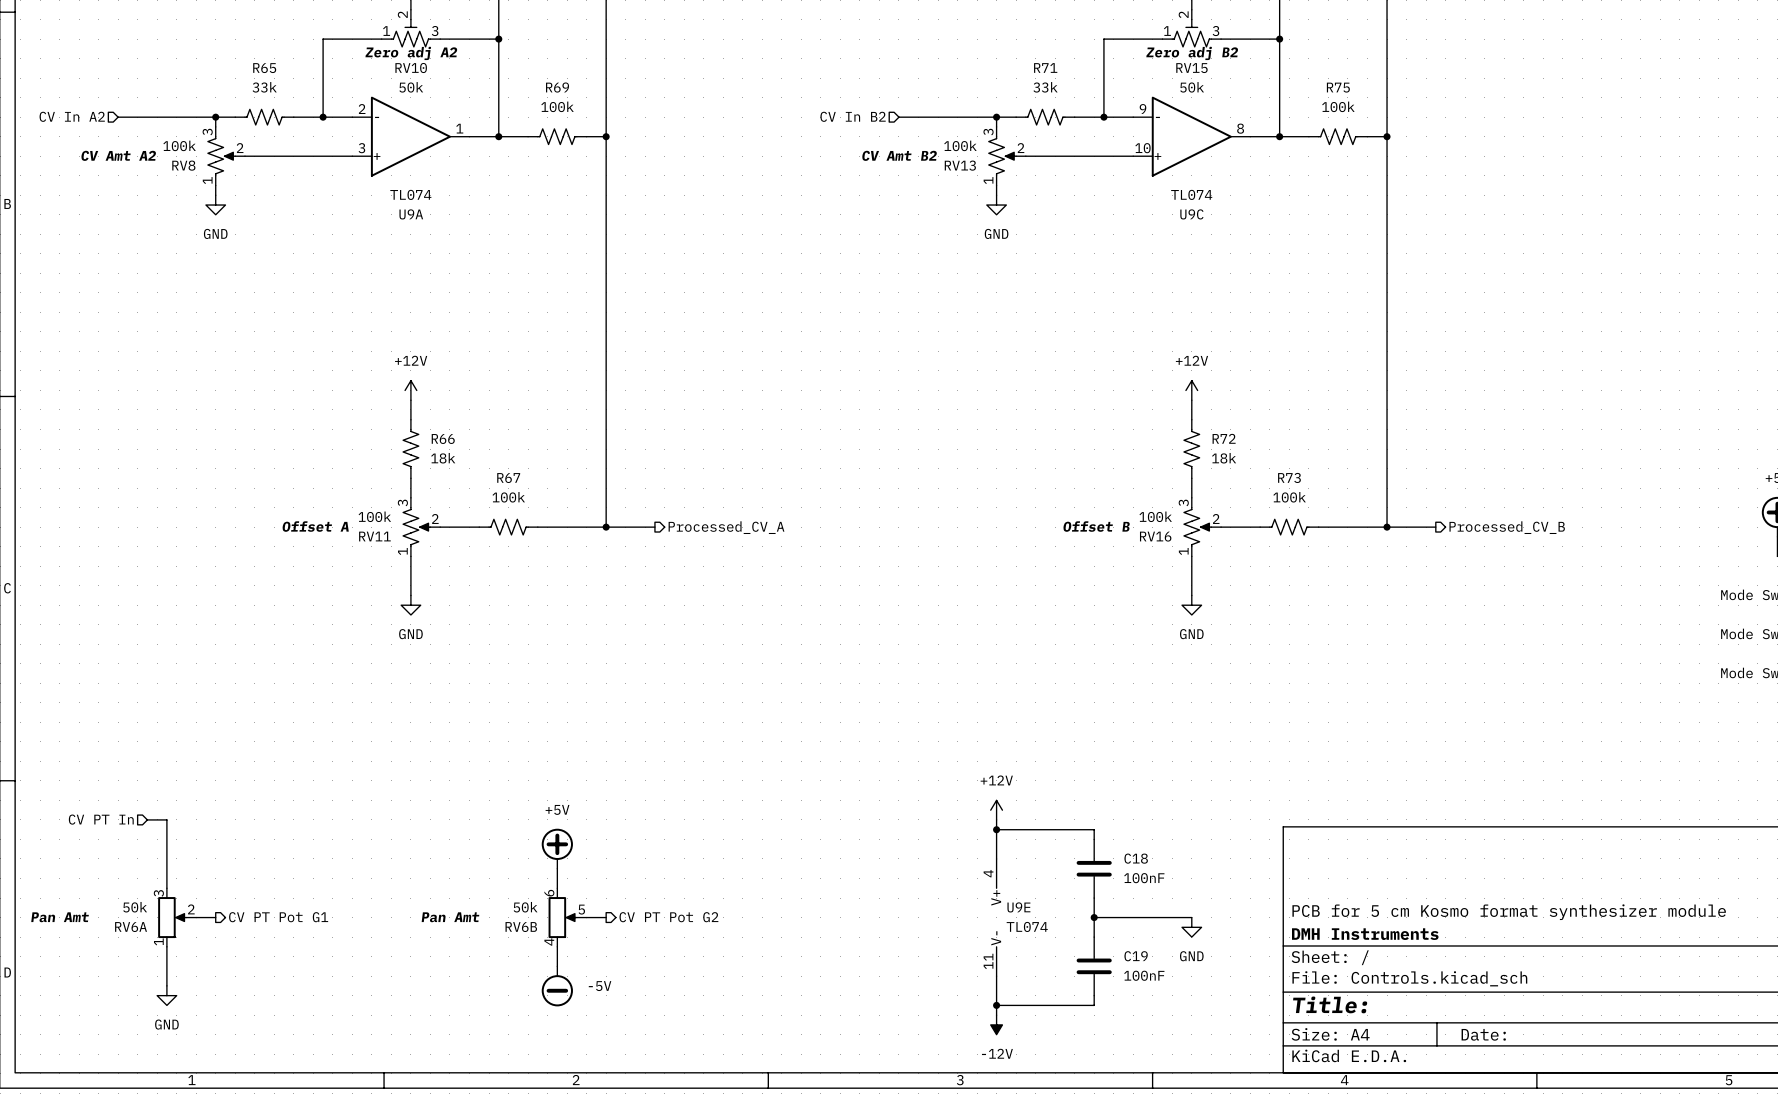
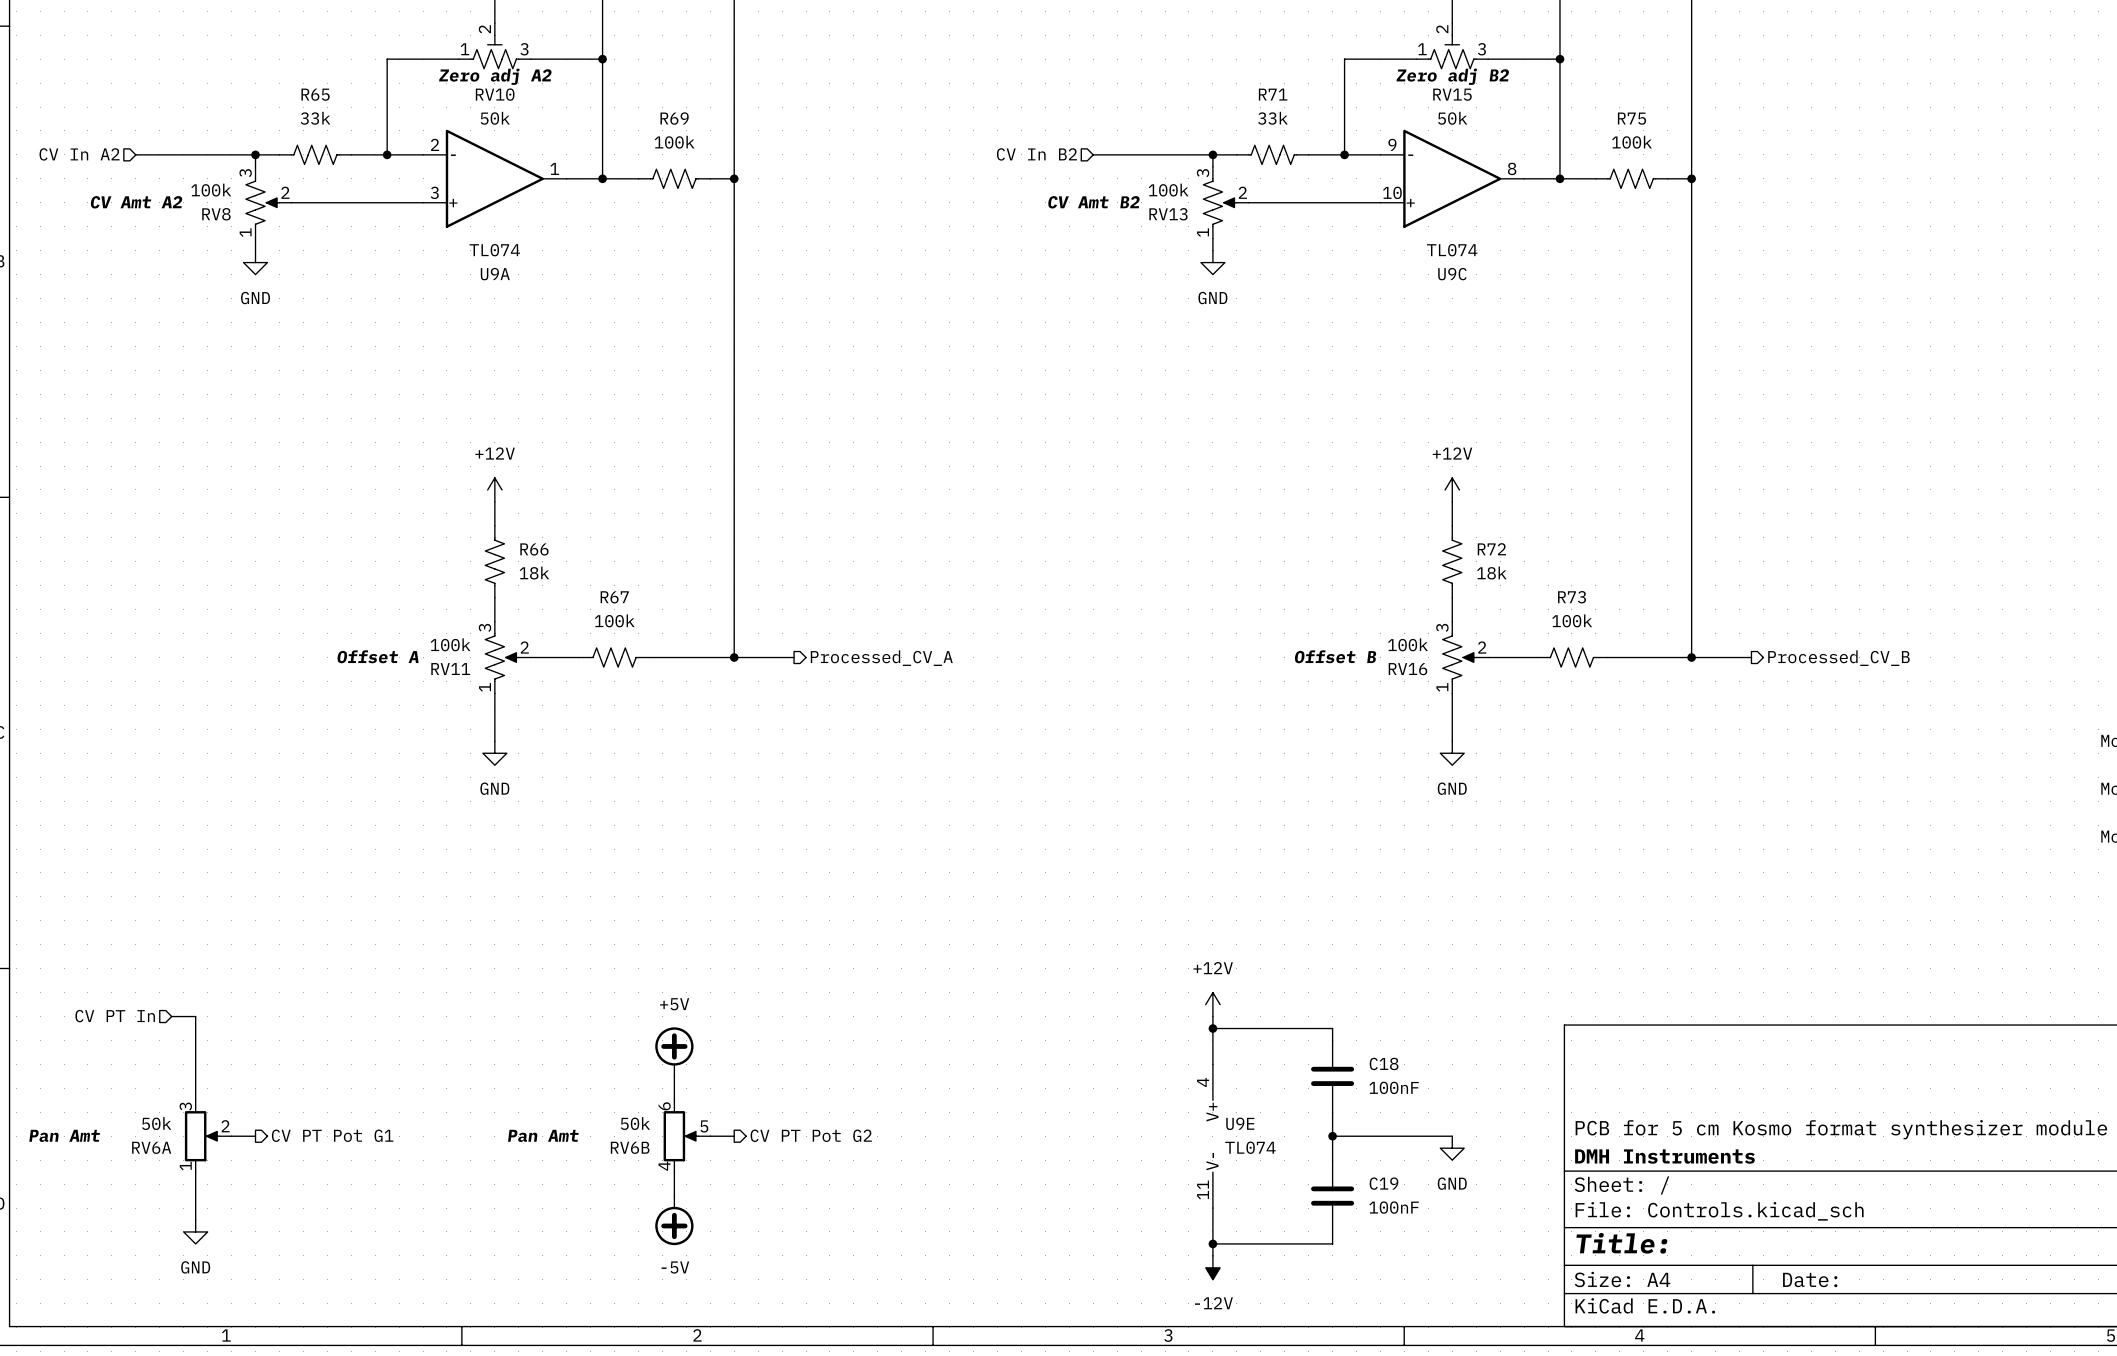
power symbol shape: [541, 966, 573, 1007] -> [655, 1196, 694, 1246]
power symbol text position: -5V (600, 986) -> -5V (675, 1267)

